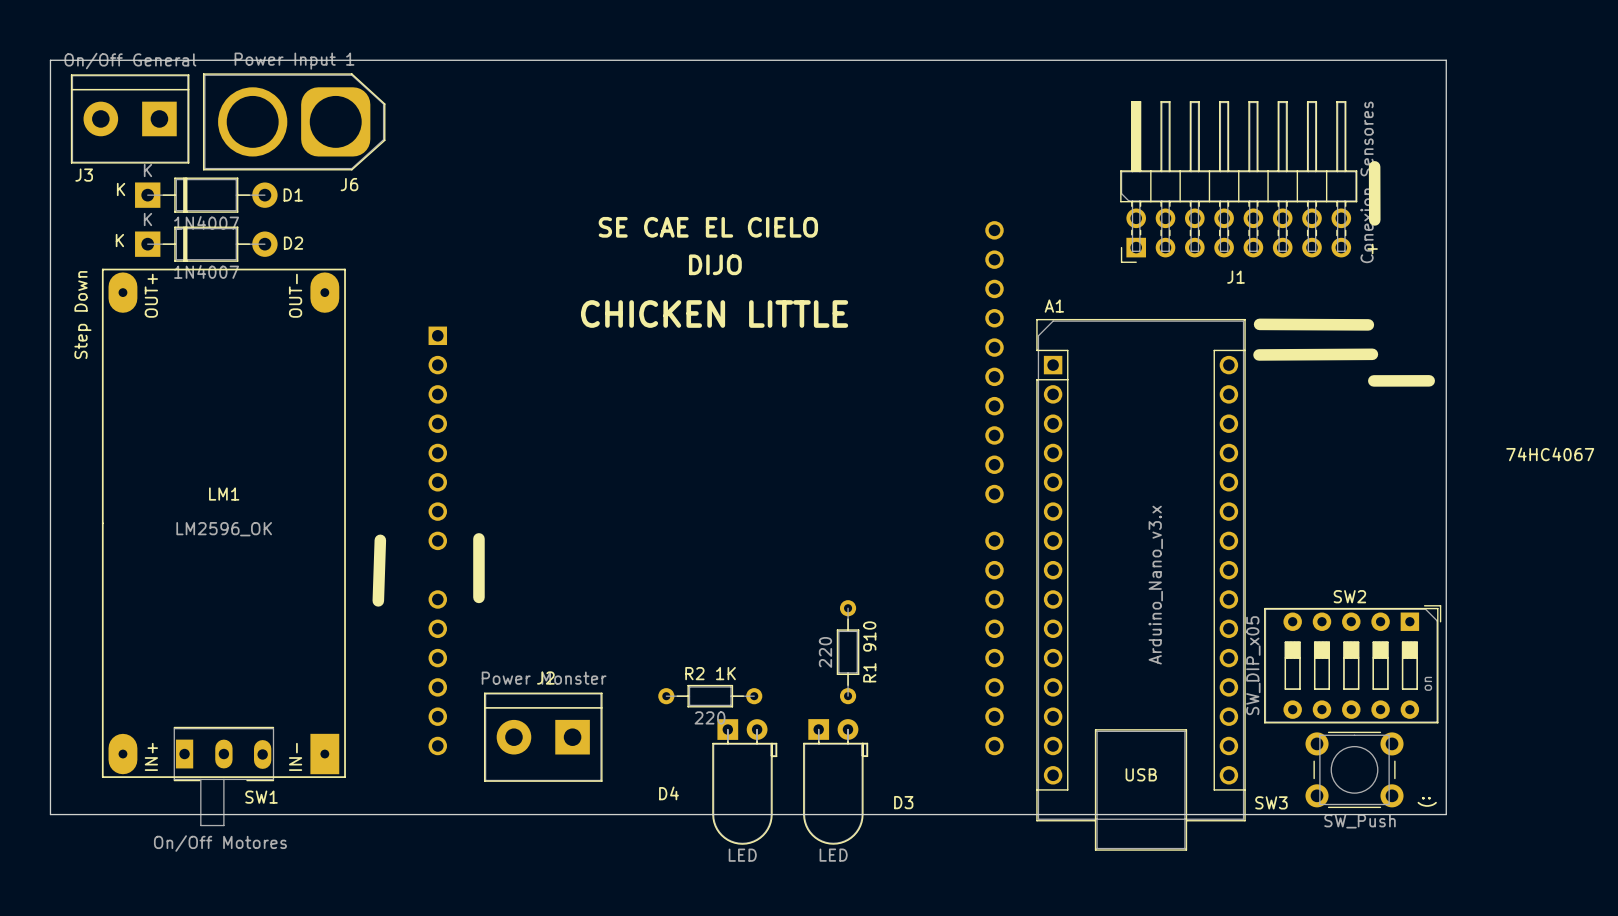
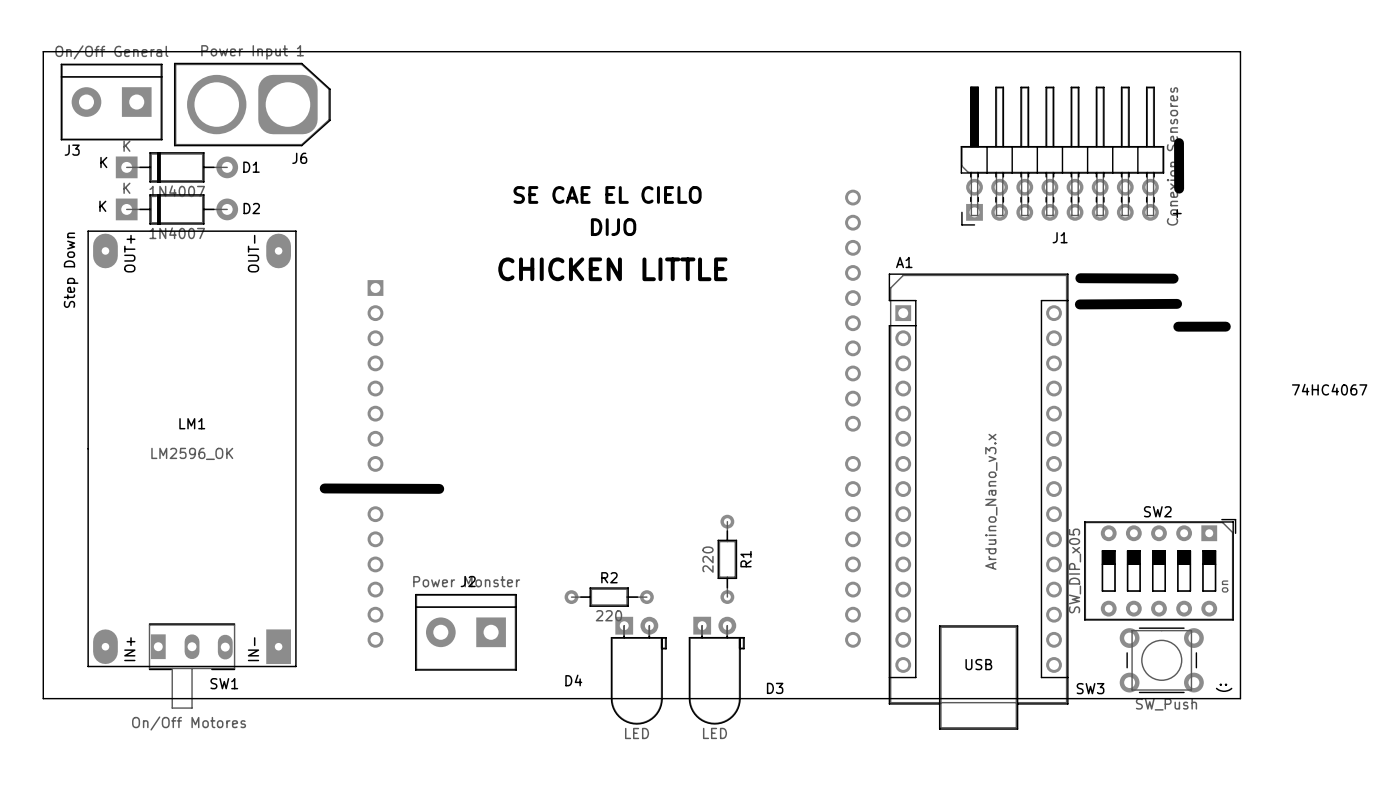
line: (478, 538) (478, 597) -> none
line: (380, 540) (378, 600) -> none
line: none -> (324, 488) (439, 488)
R1 910 name: R1 910 (869, 651) -> R1 (745, 559)
R2 1K name: R2 1K (710, 673) -> R2 (609, 577)

